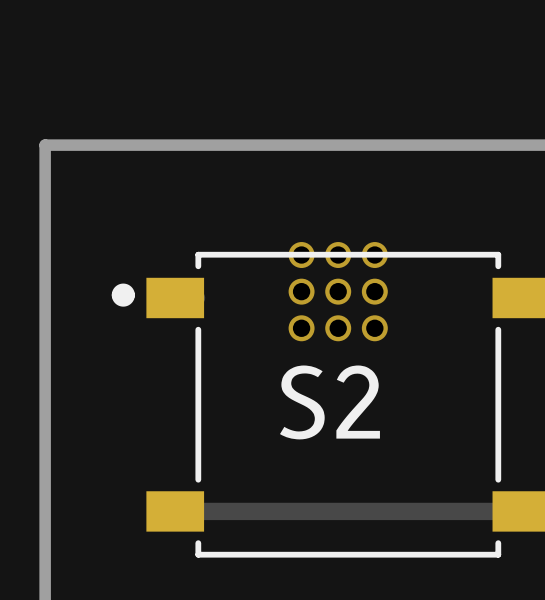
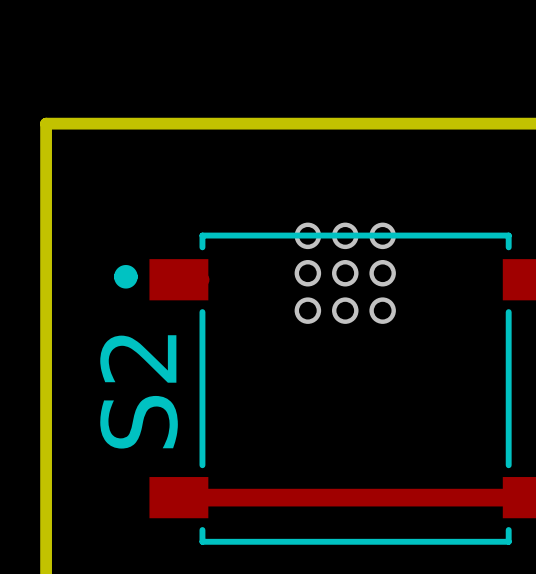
S2 name rotation: 0° (329, 402) -> 90° counterclockwise (139, 391)
S2 name position: S2 (329, 402) -> S2 (139, 391)

